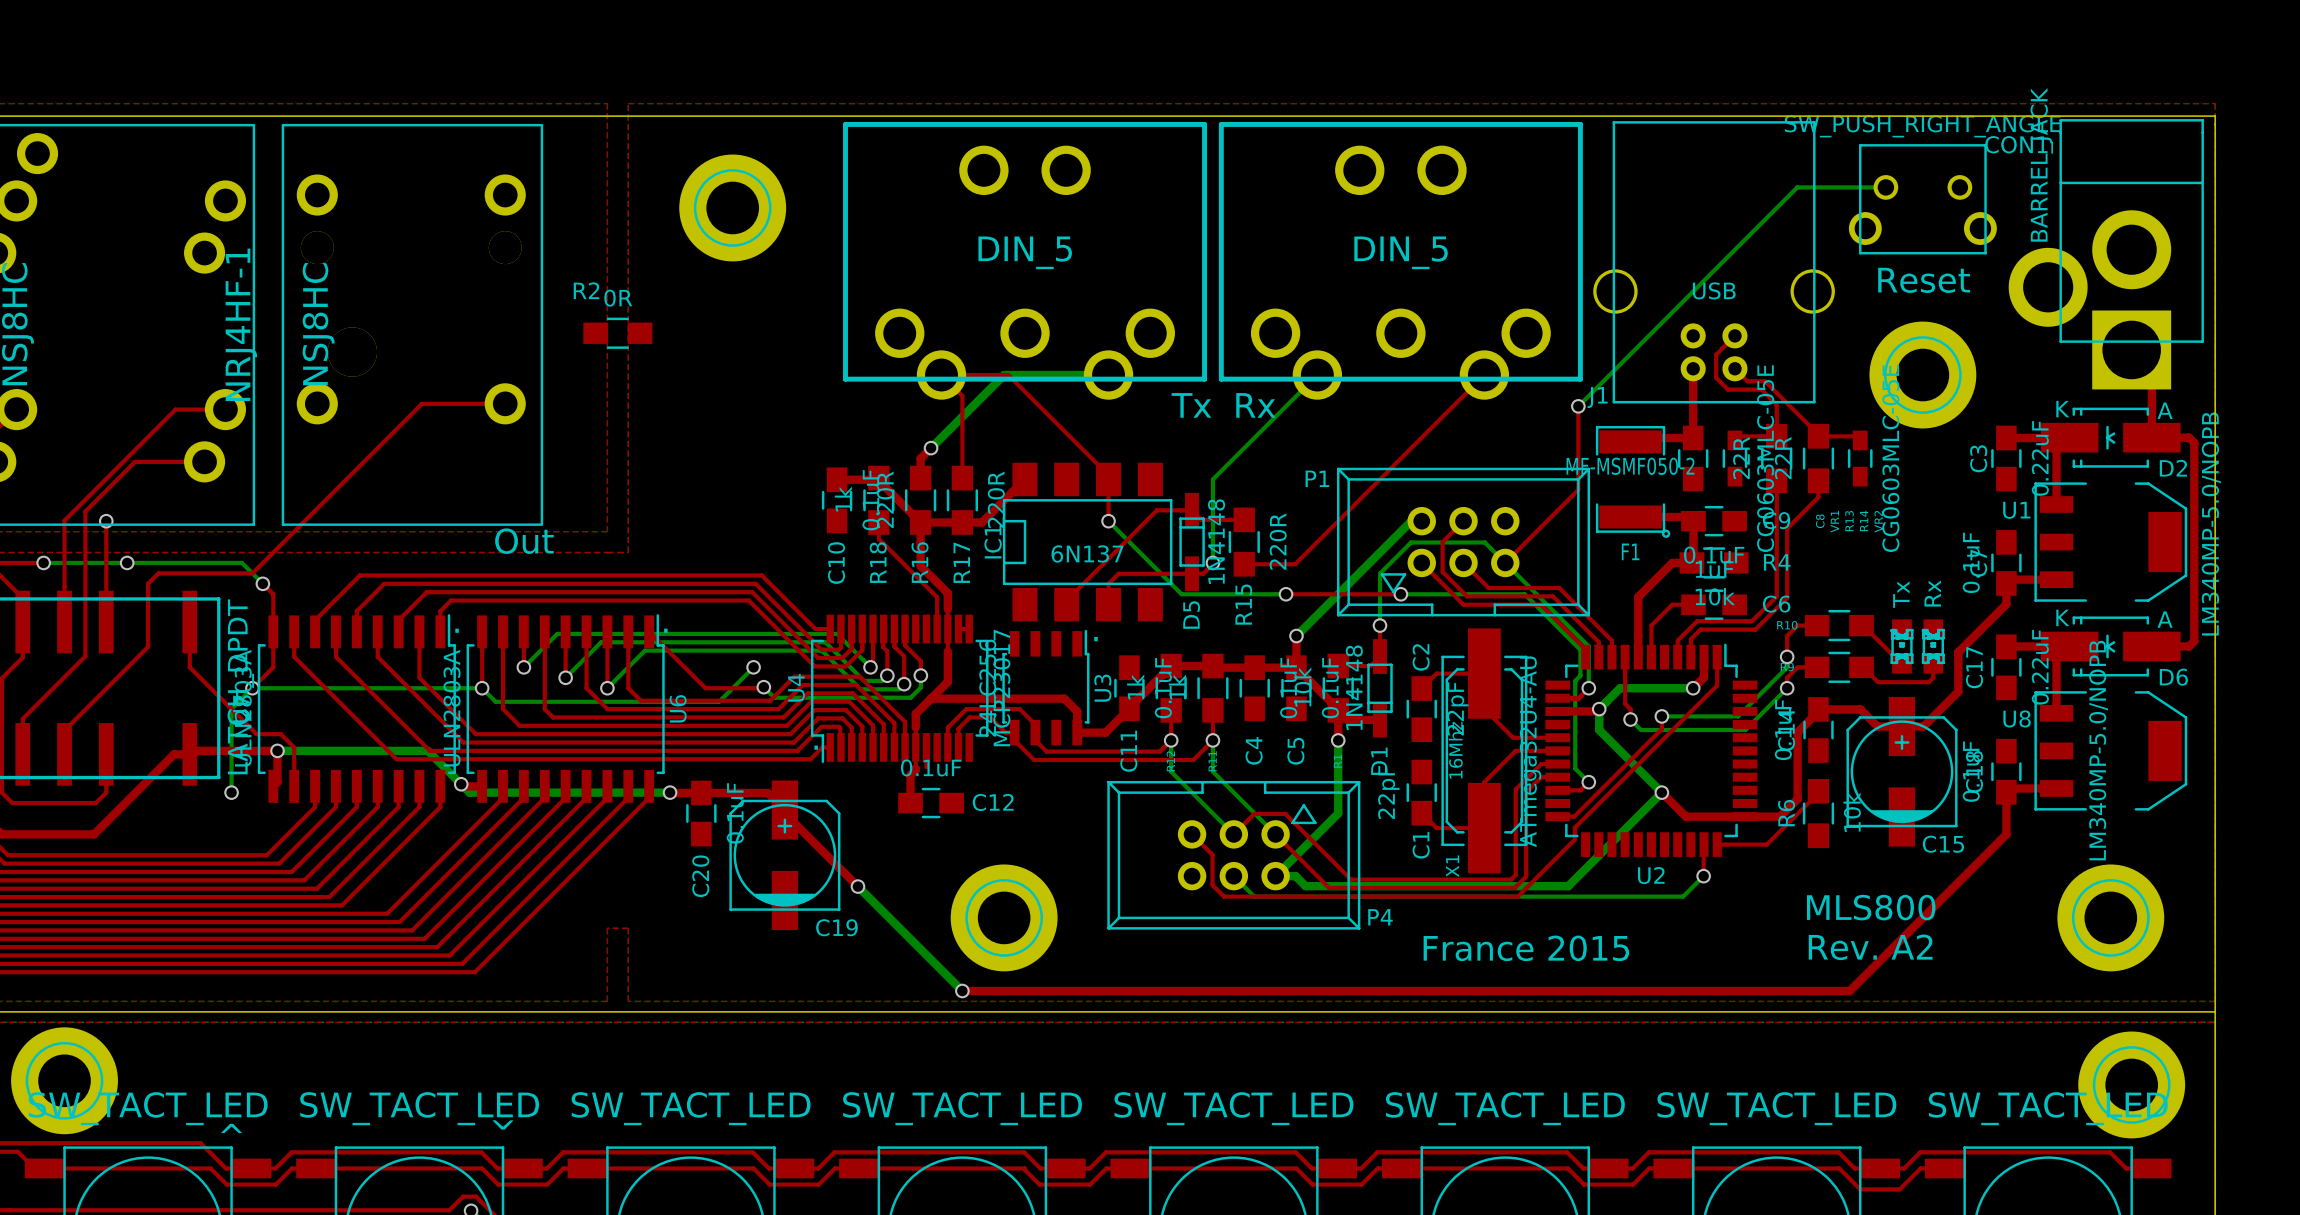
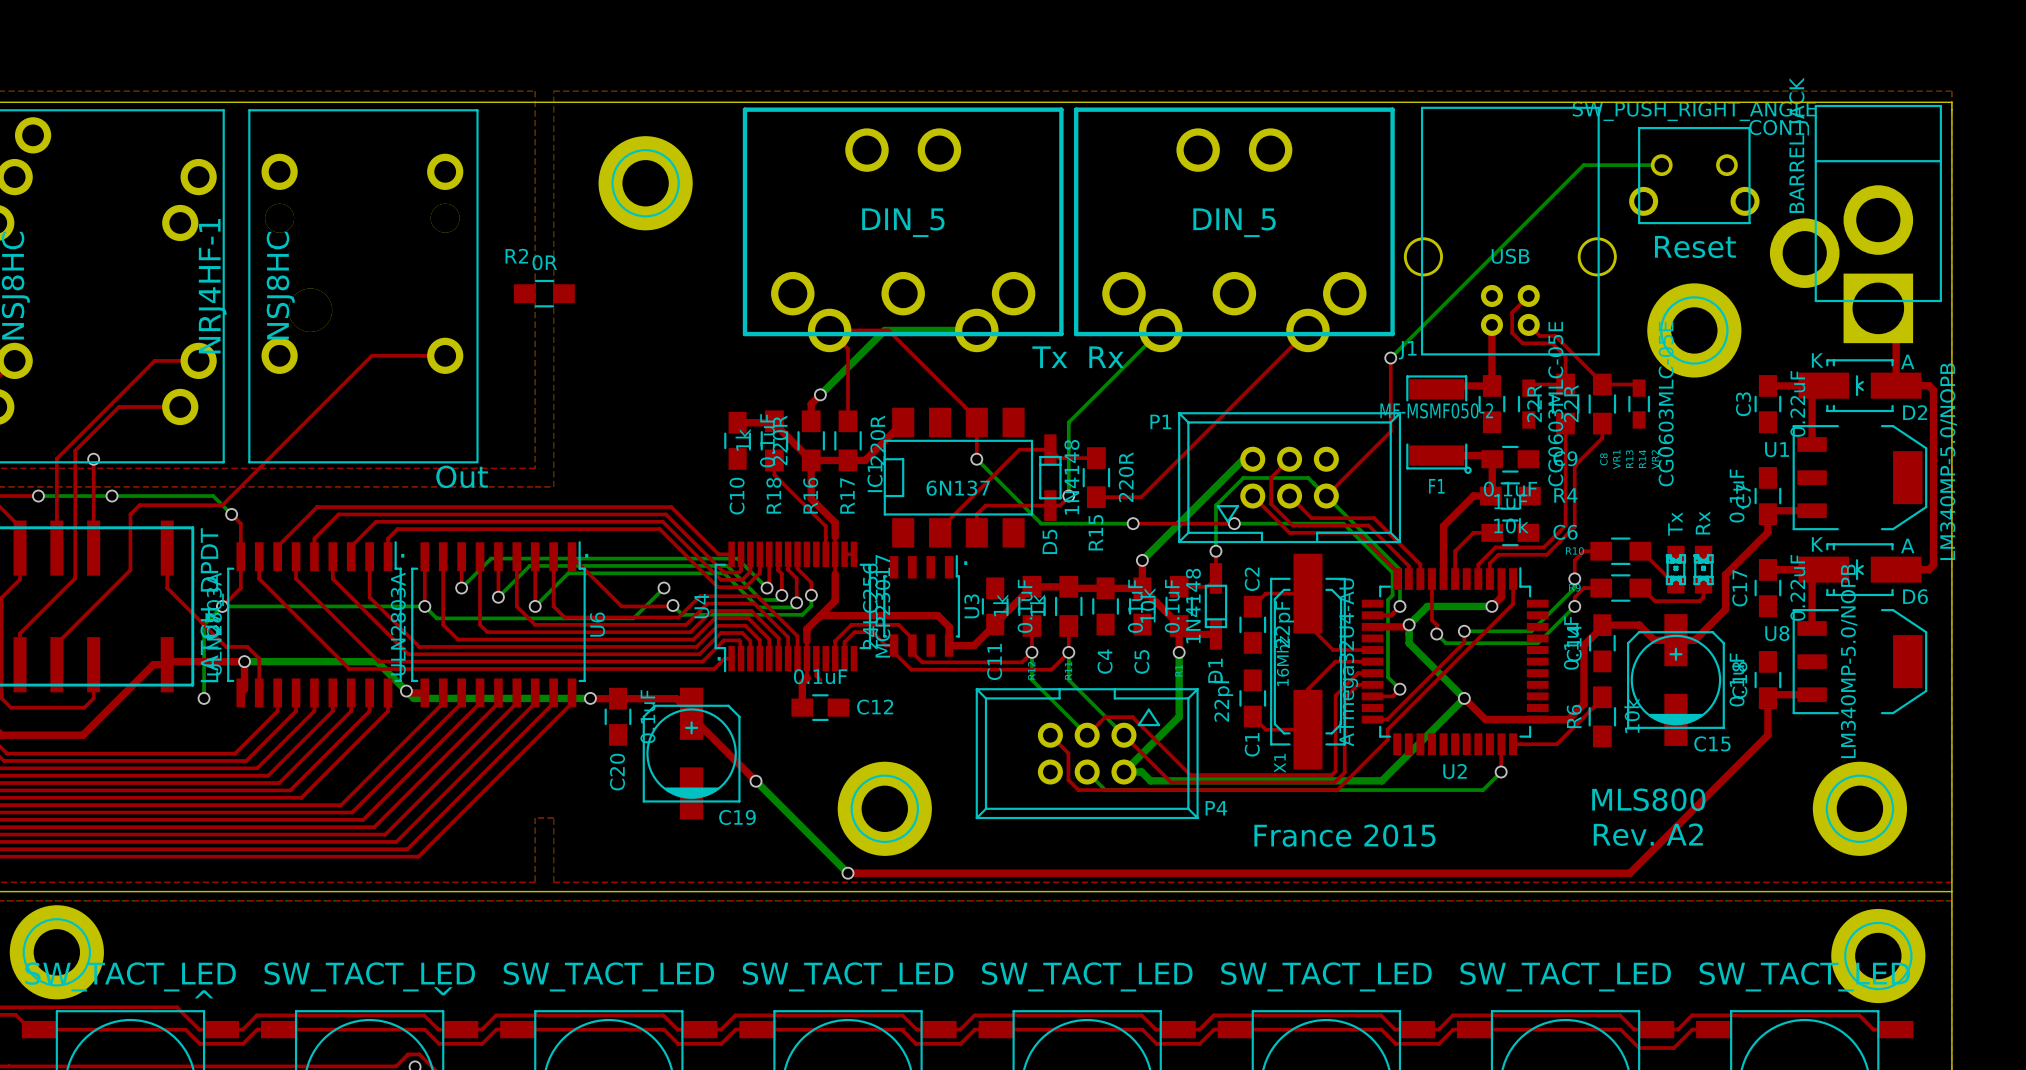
top track: none -> (816, 675) (820, 680)

